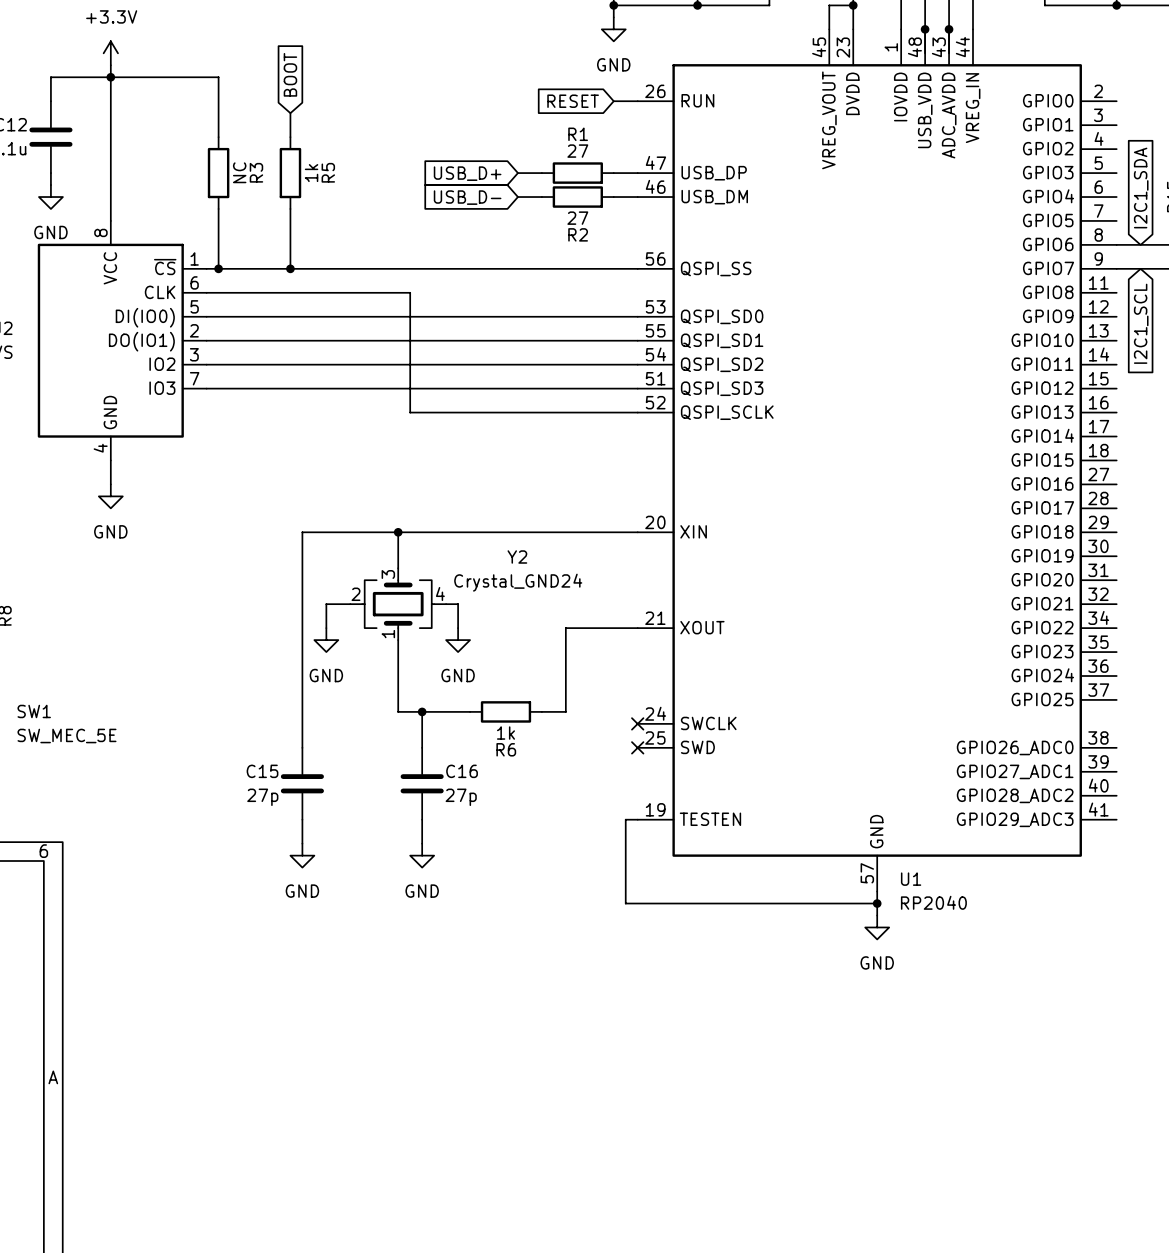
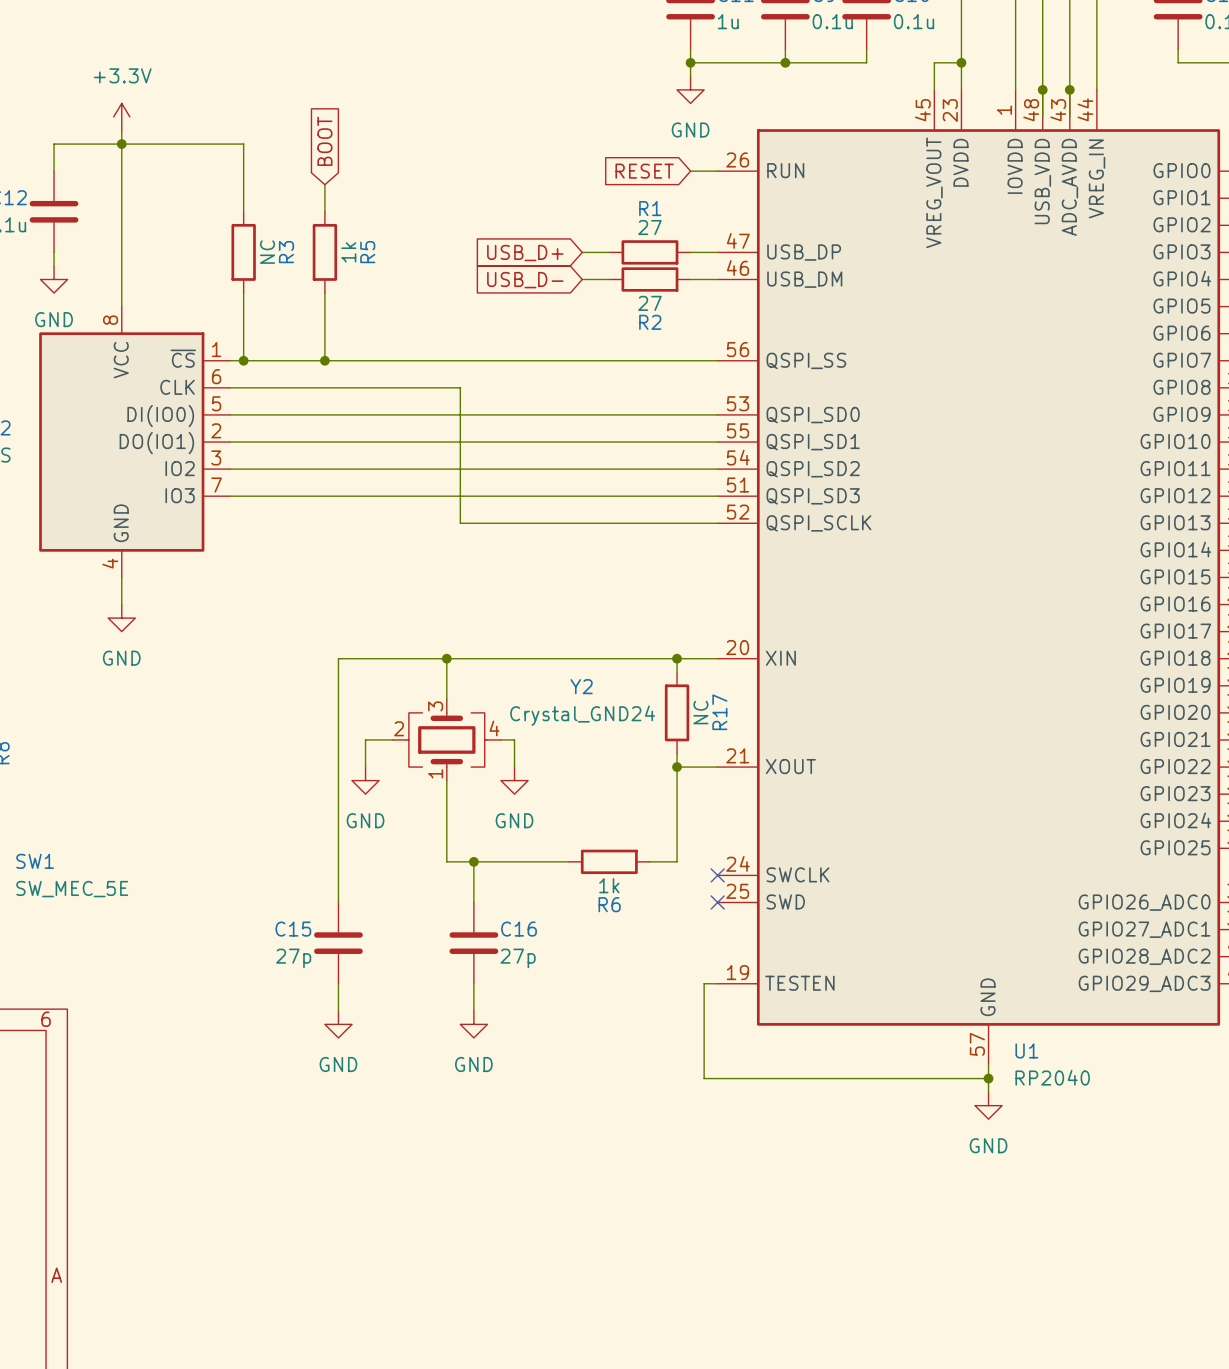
wire: none -> (677, 658) (677, 672)
junction: none -> (677, 658)
R17: none -> NC (677, 712)
wire: none -> (677, 753) (677, 861) (649, 861)
wire: (601, 628) (565, 628) (565, 711) (541, 711) -> none
junction: none -> (677, 767)
wire: none -> (528, 861) (568, 861)
R6 position: (505, 711) -> (609, 861)

